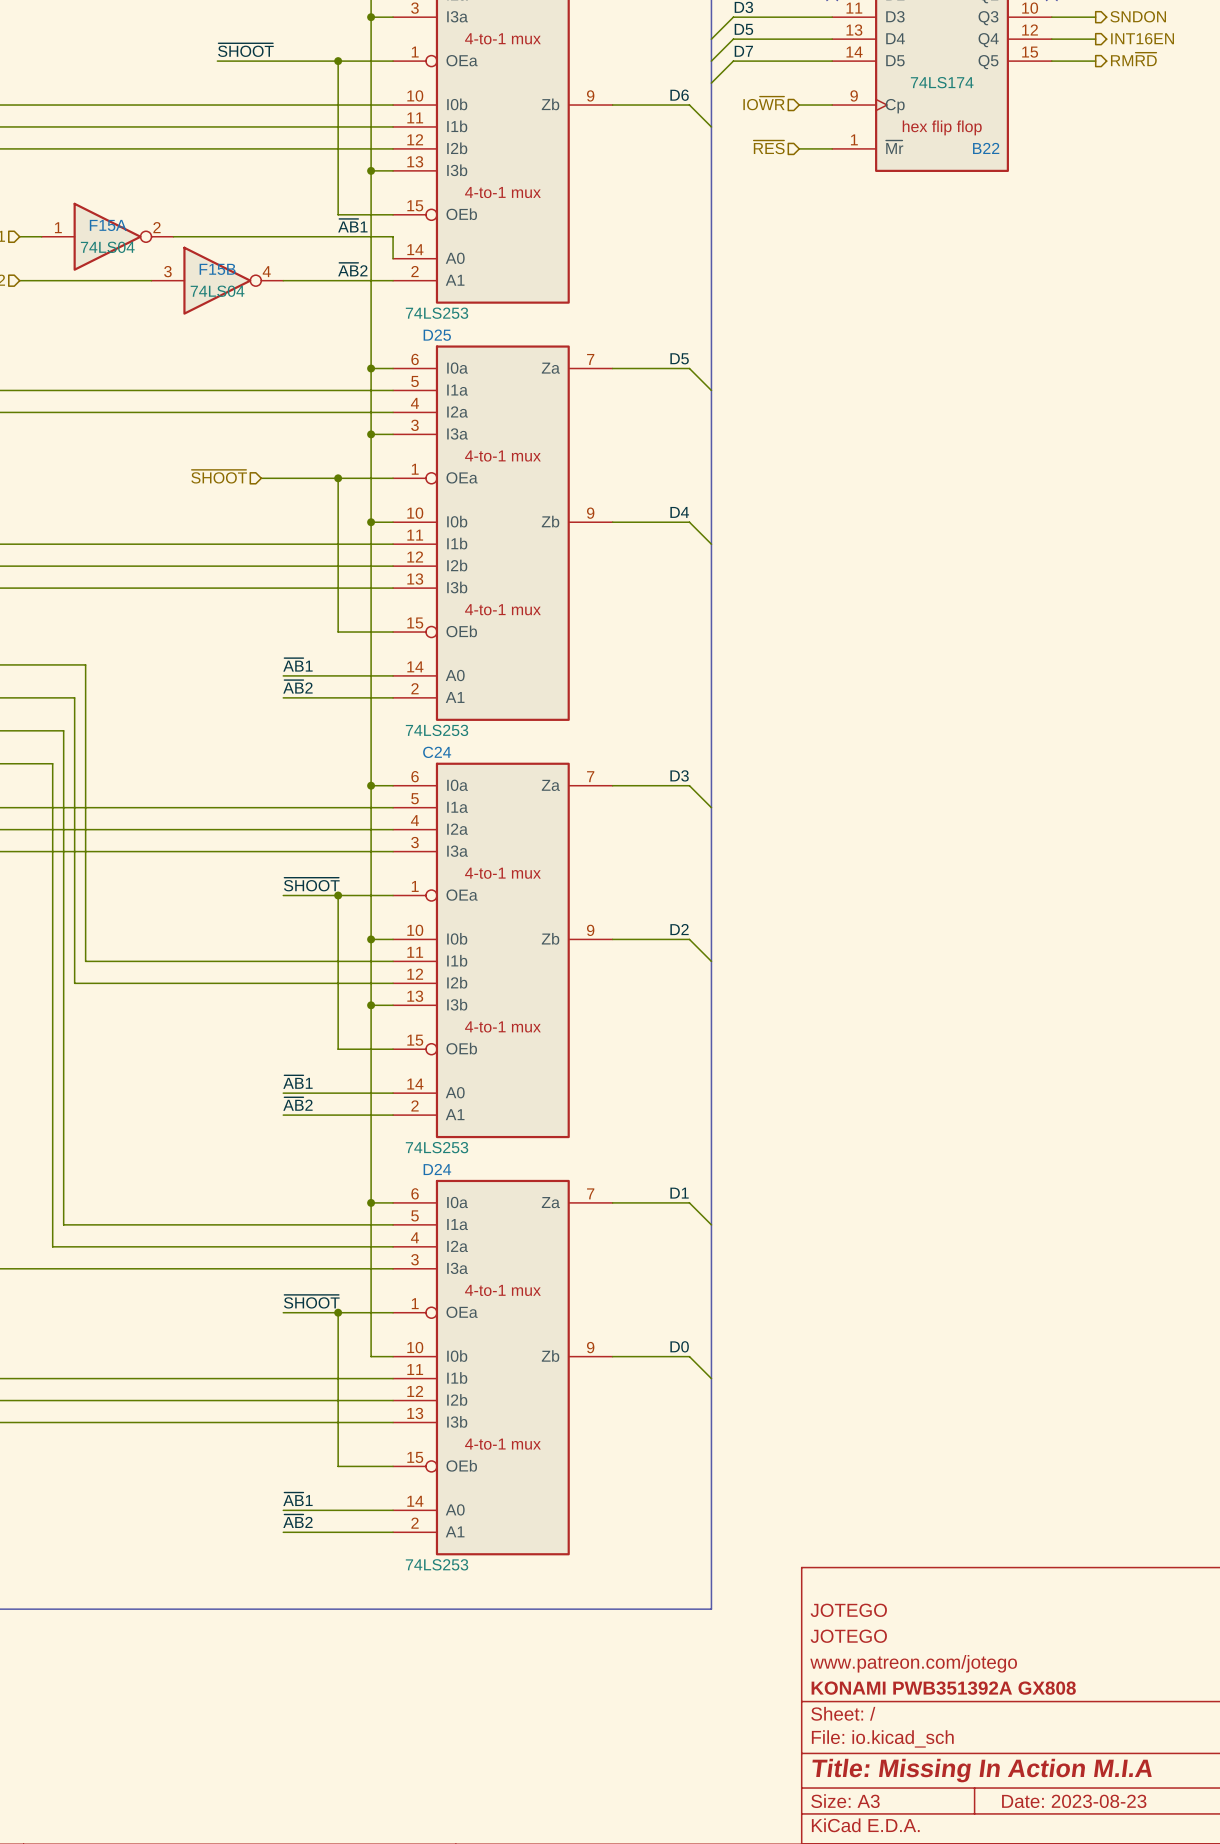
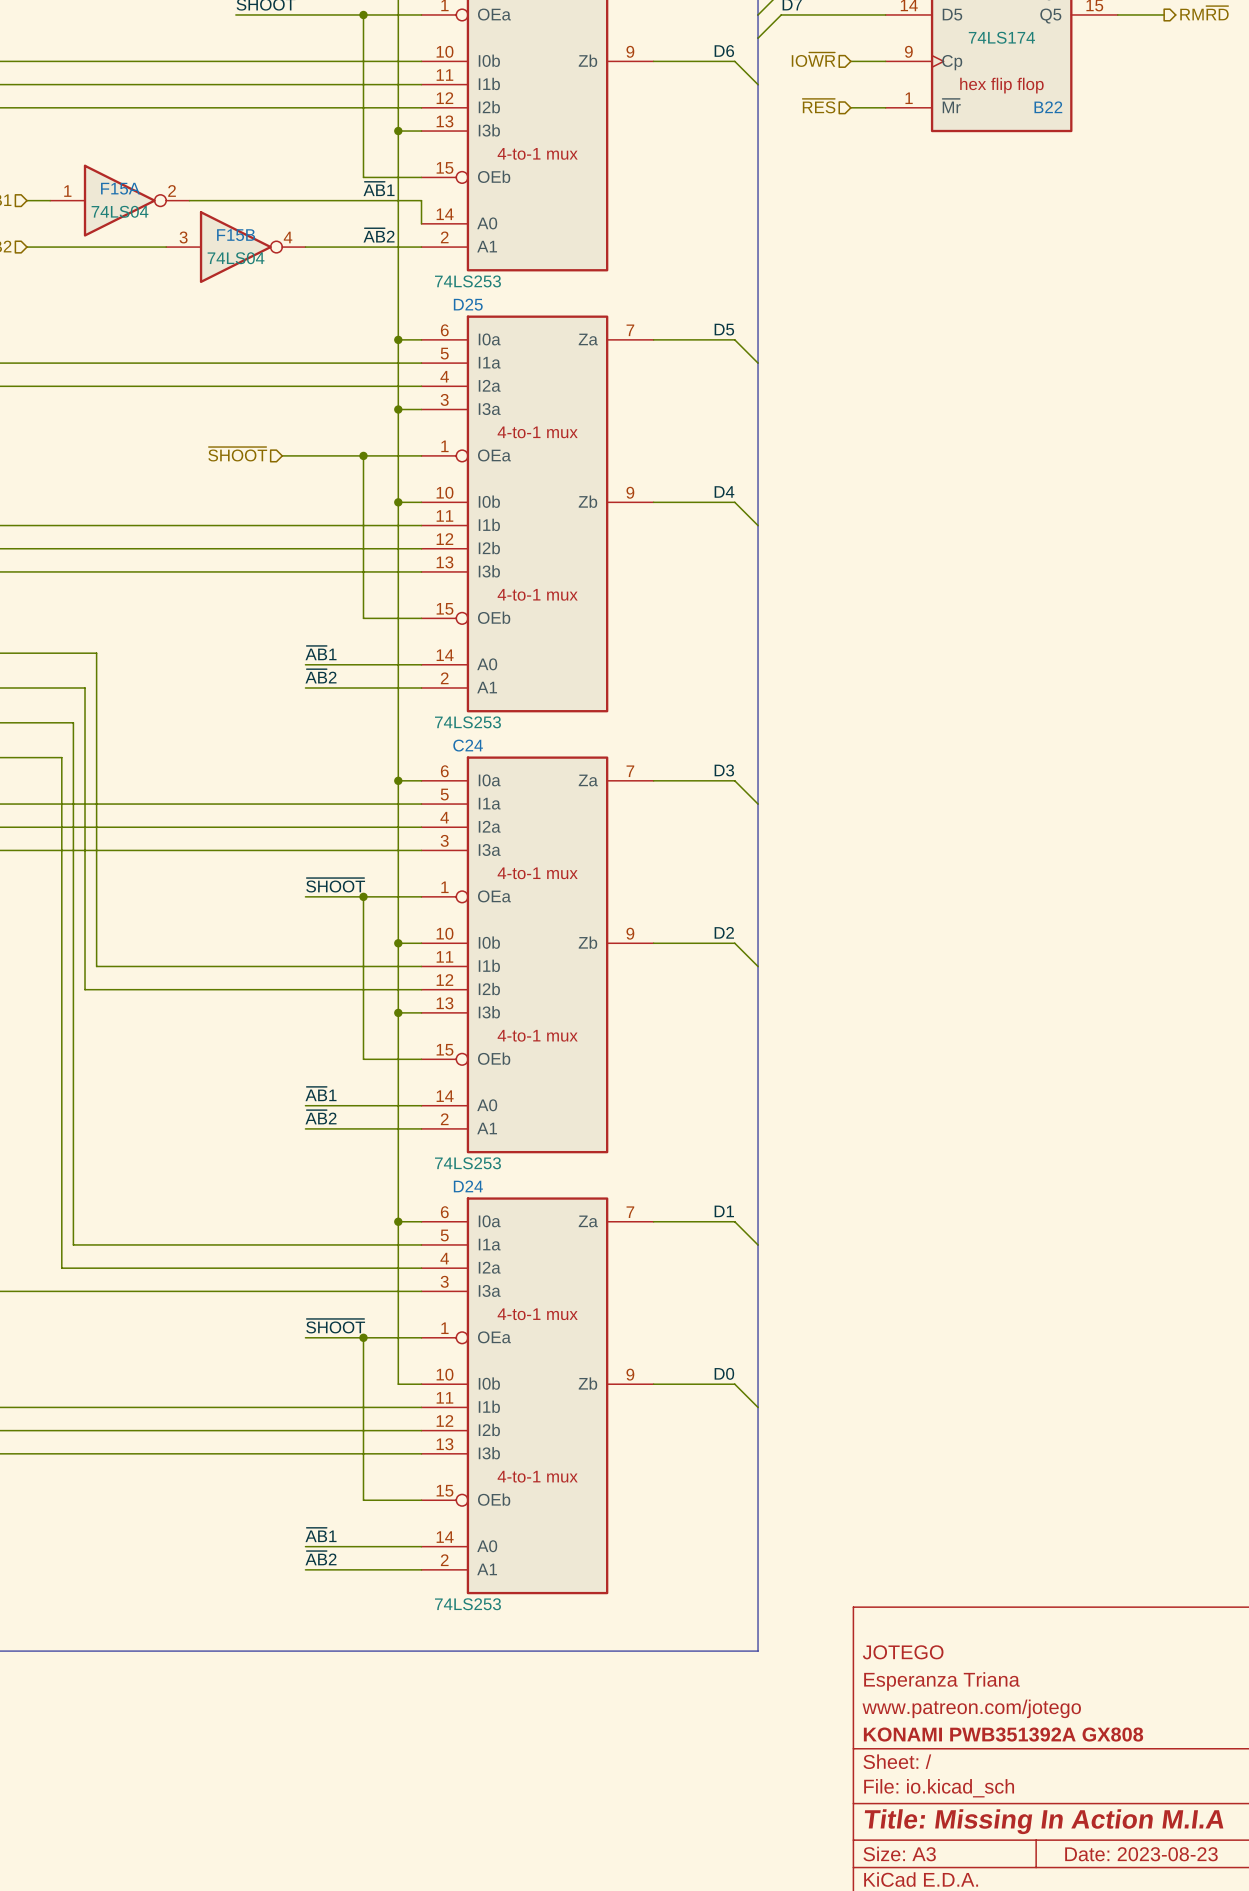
title block: JOTEGO (848, 1636) -> Esperanza Triana (941, 1681)

